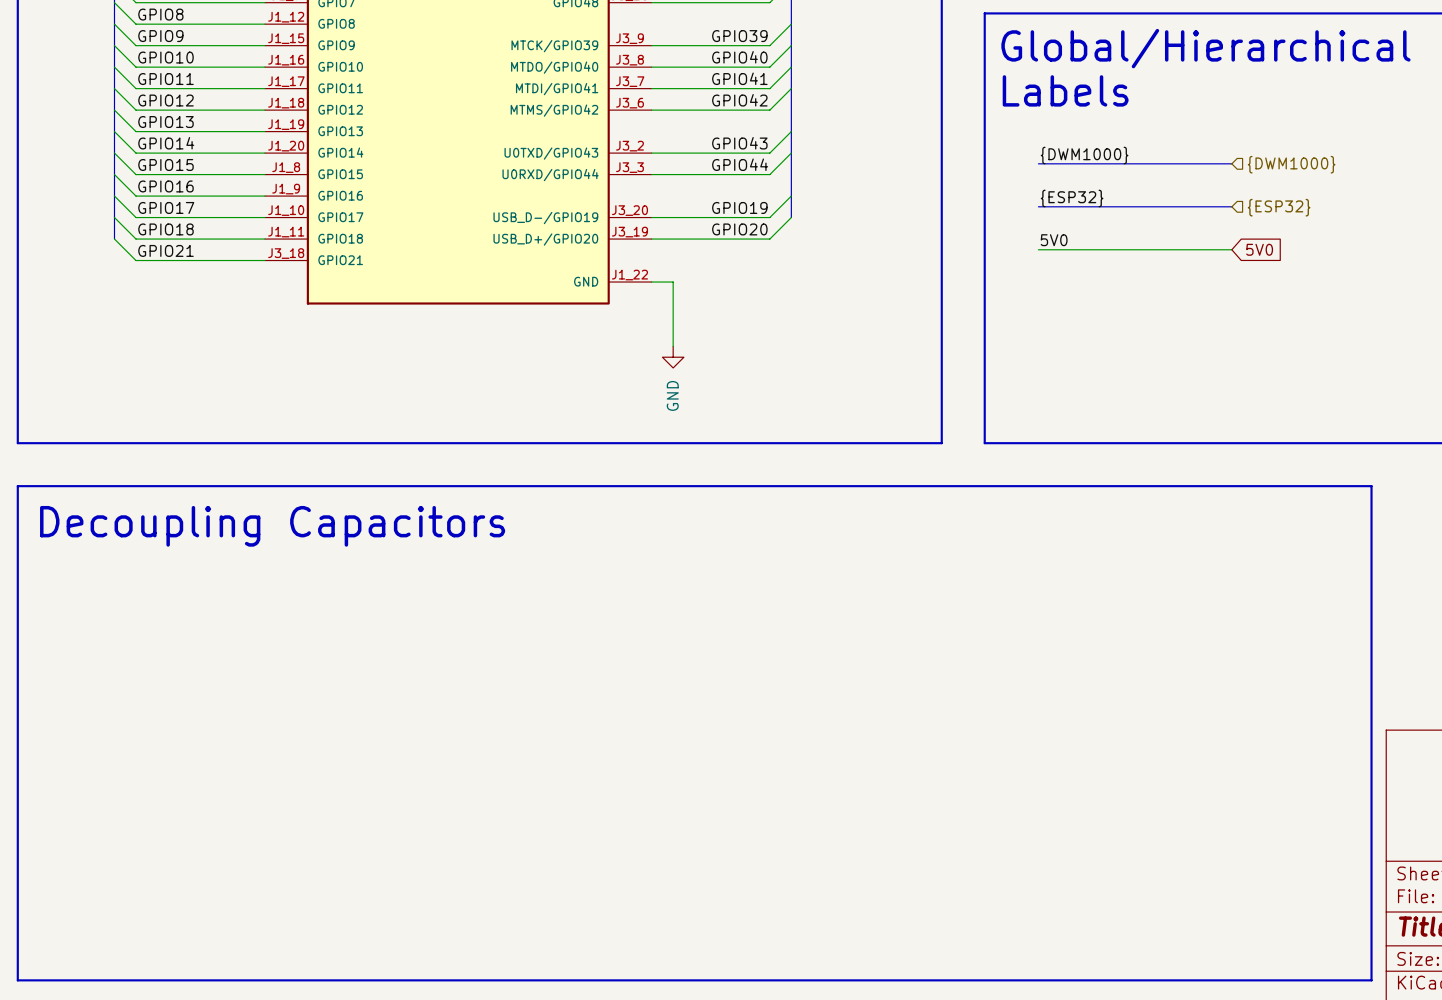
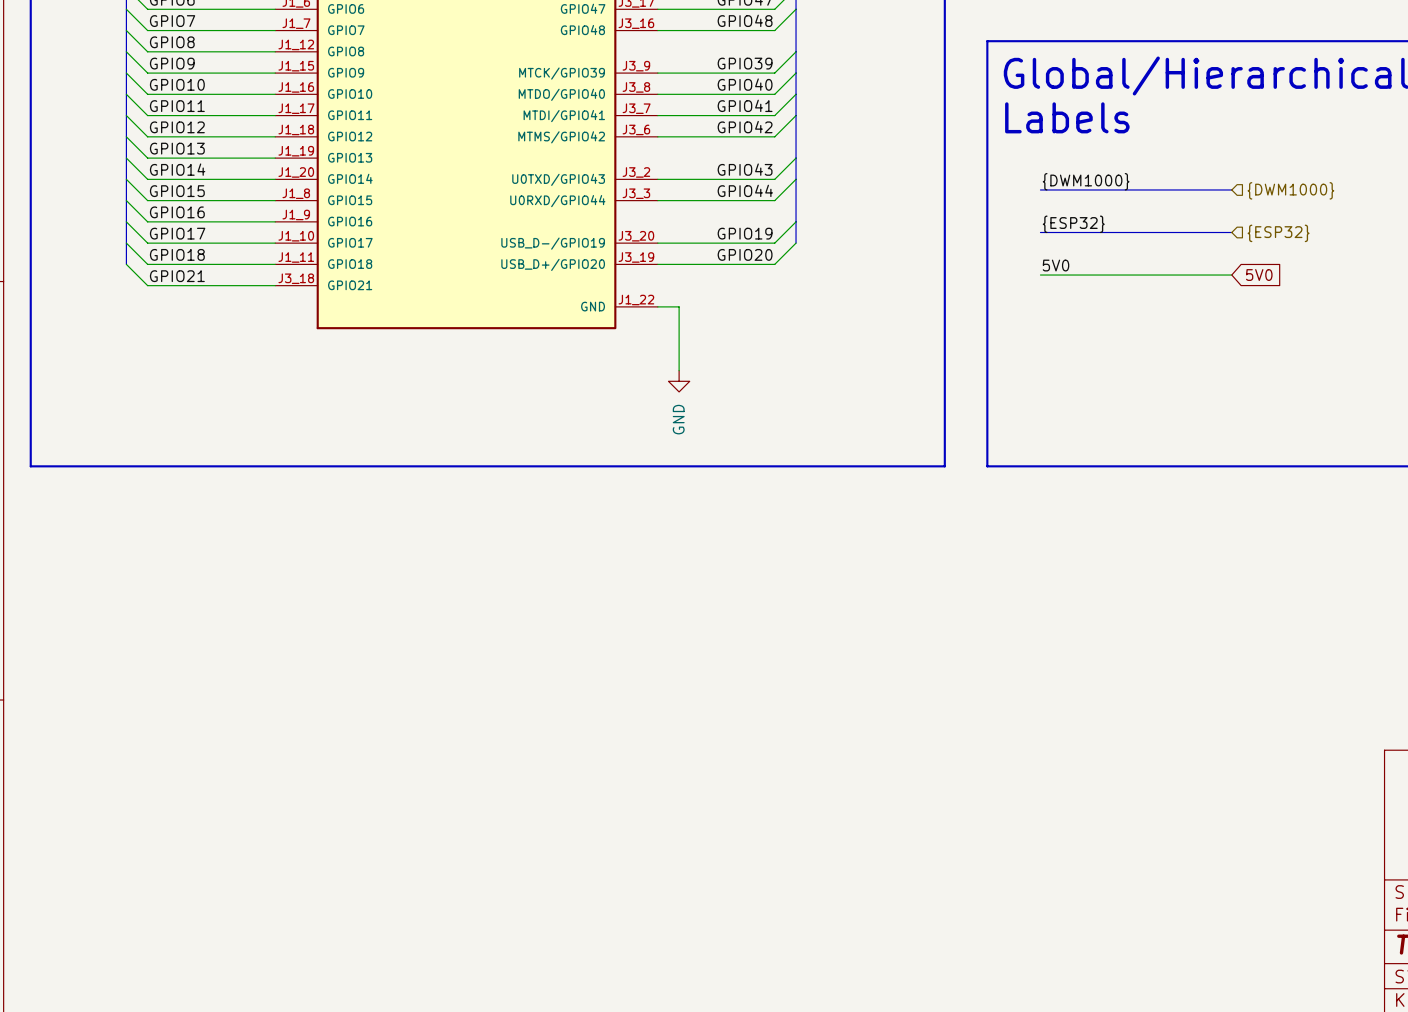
line: (17, 486) (1371, 486) (1371, 980) (17, 980) (17, 486) -> none
text: Decoupling Capacitors (272, 526) -> none

